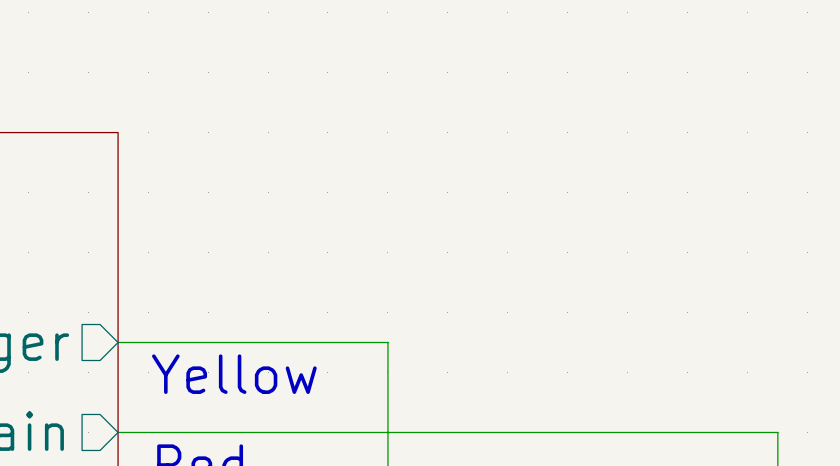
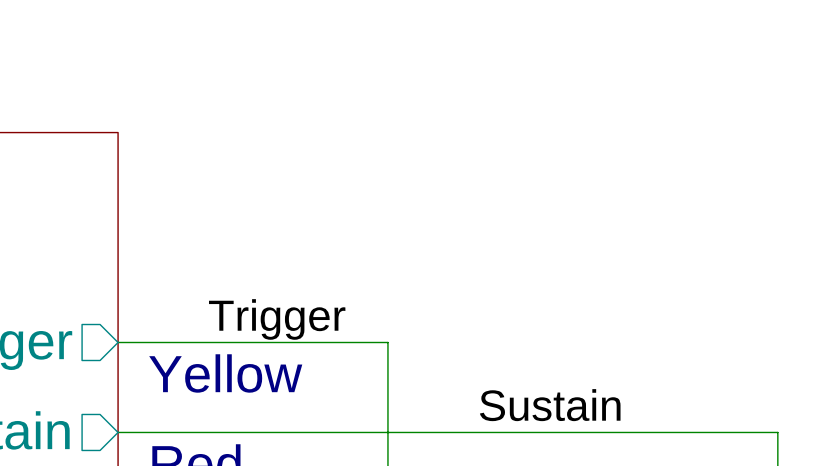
label: none -> Trigger (277, 319)
label: none -> Sustain (550, 405)

